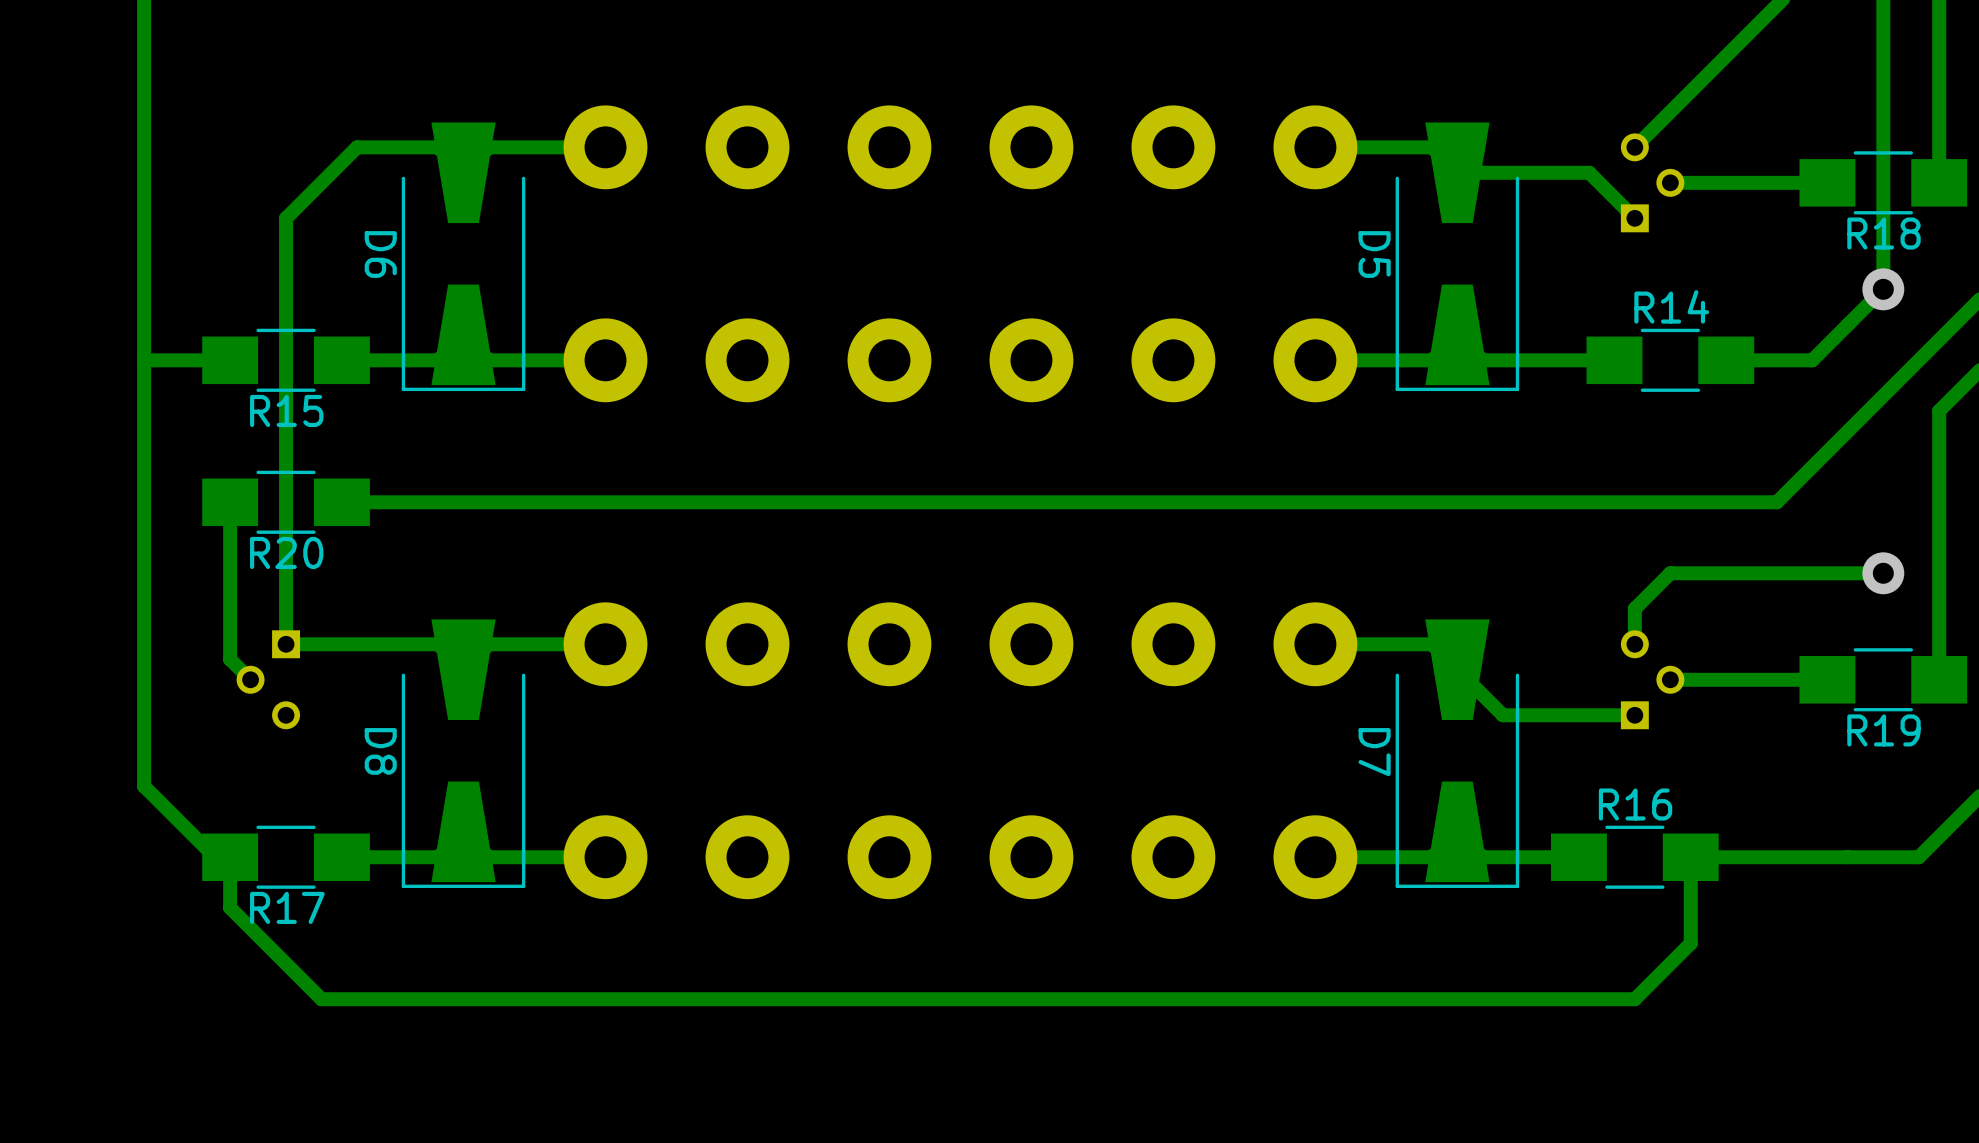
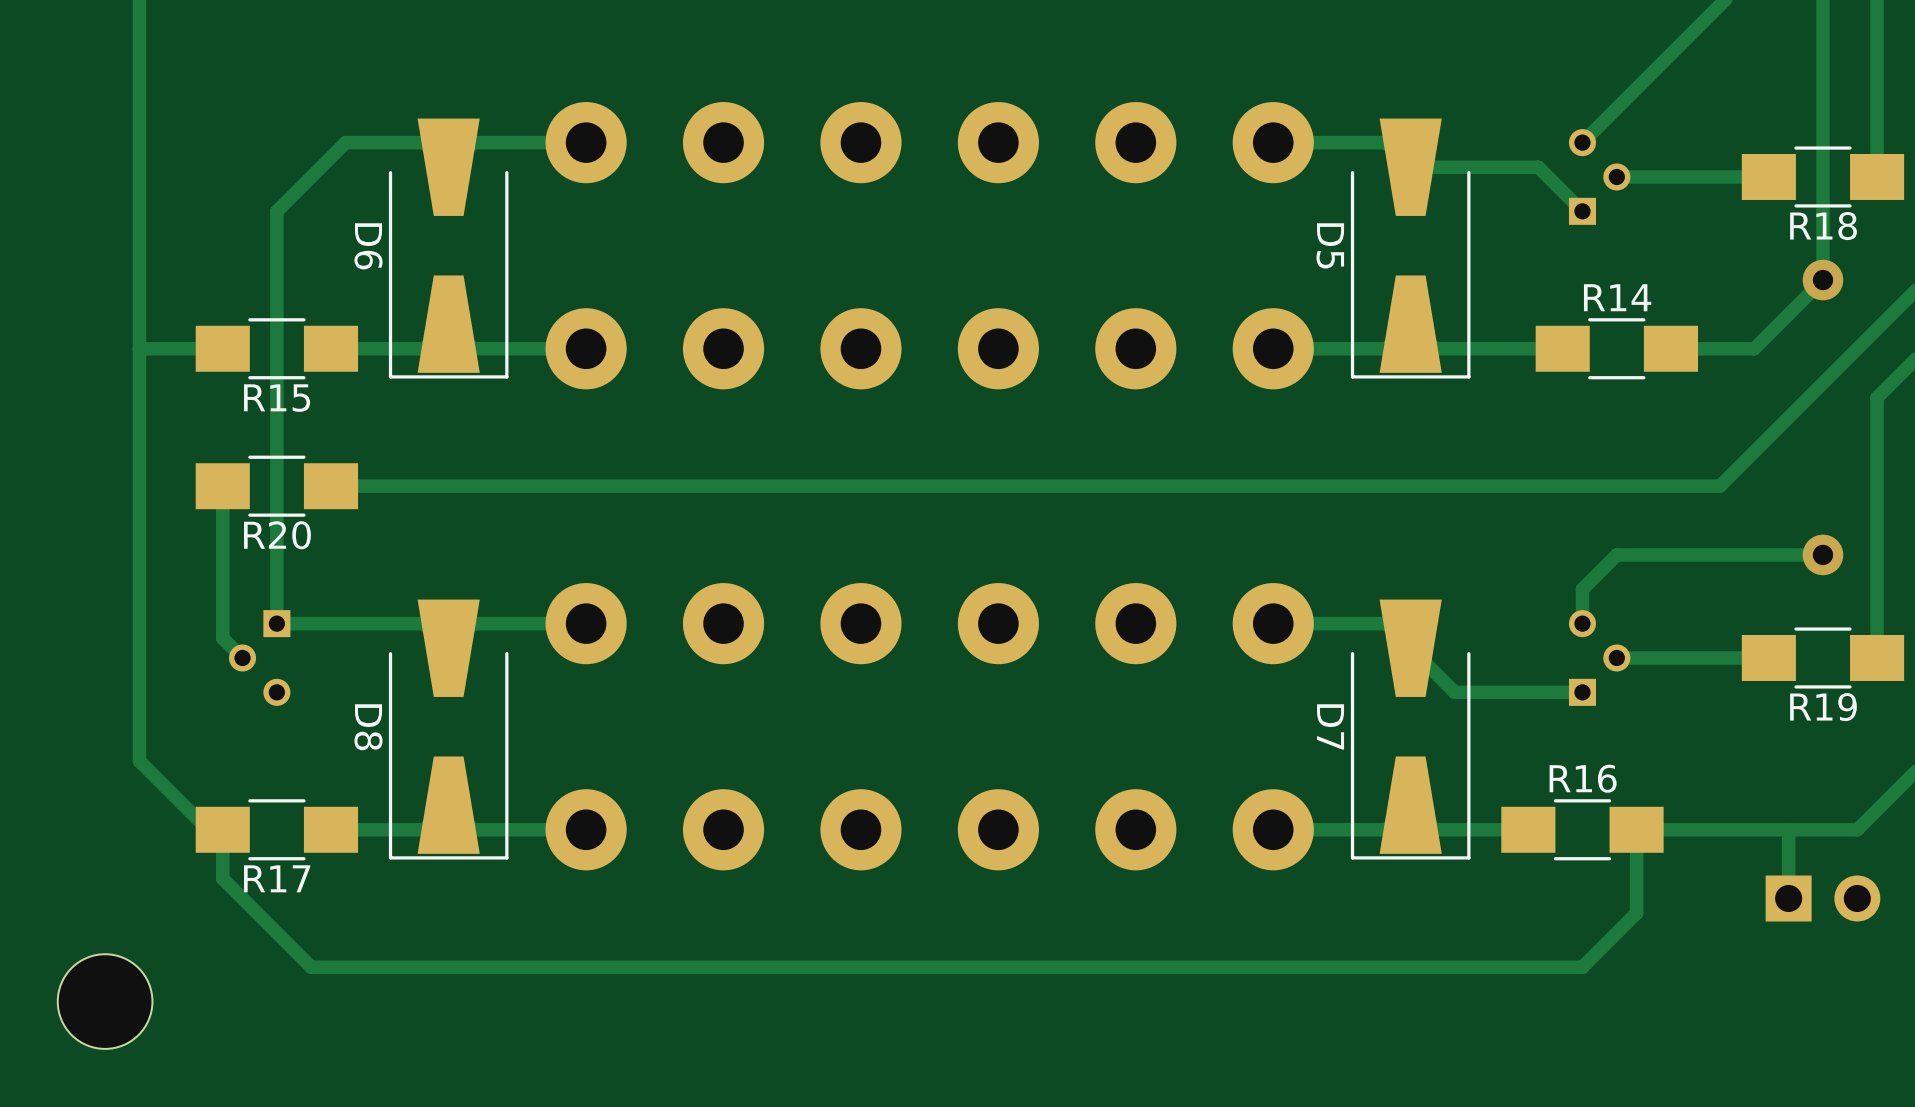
track: none -> (1788, 829) (1788, 898)
part: none -> (1822, 898)
part: none -> (105, 1001)

